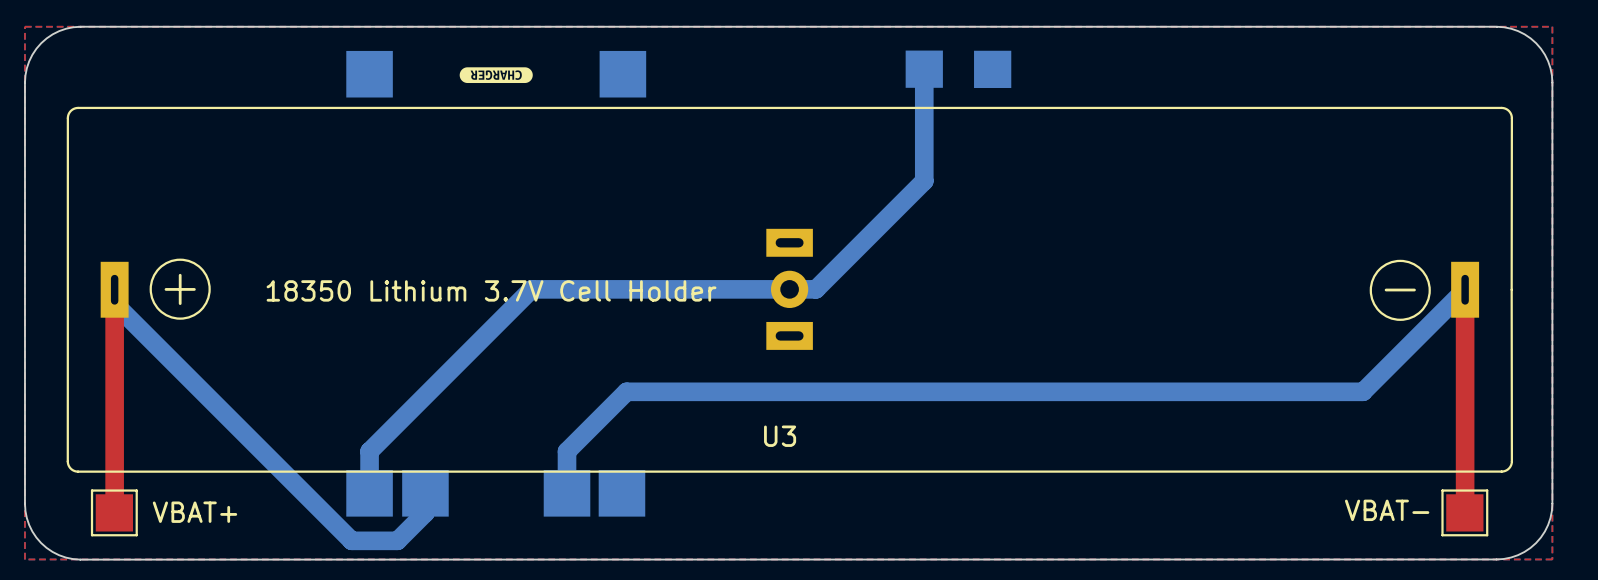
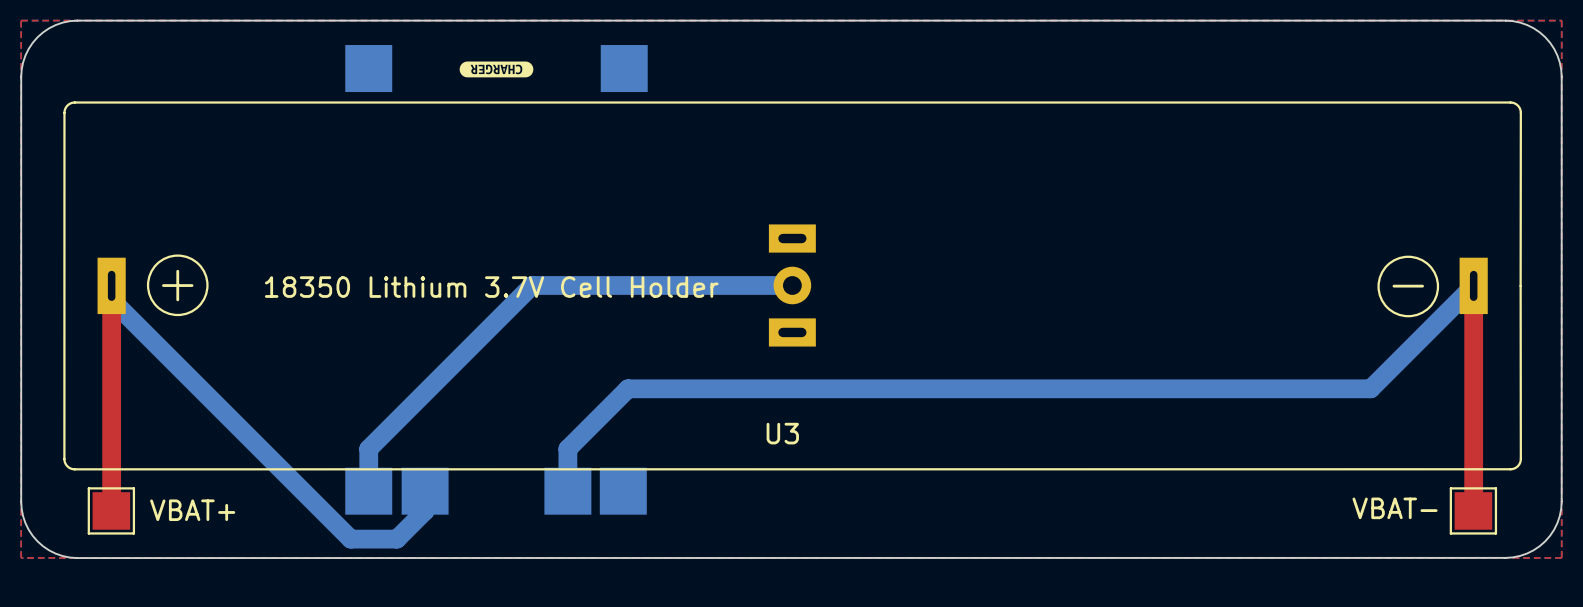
bottom track: (924, 69) (924, 181) (815, 289) (789, 289) -> none
part: (924, 69) -> none
part: (992, 69) -> none

